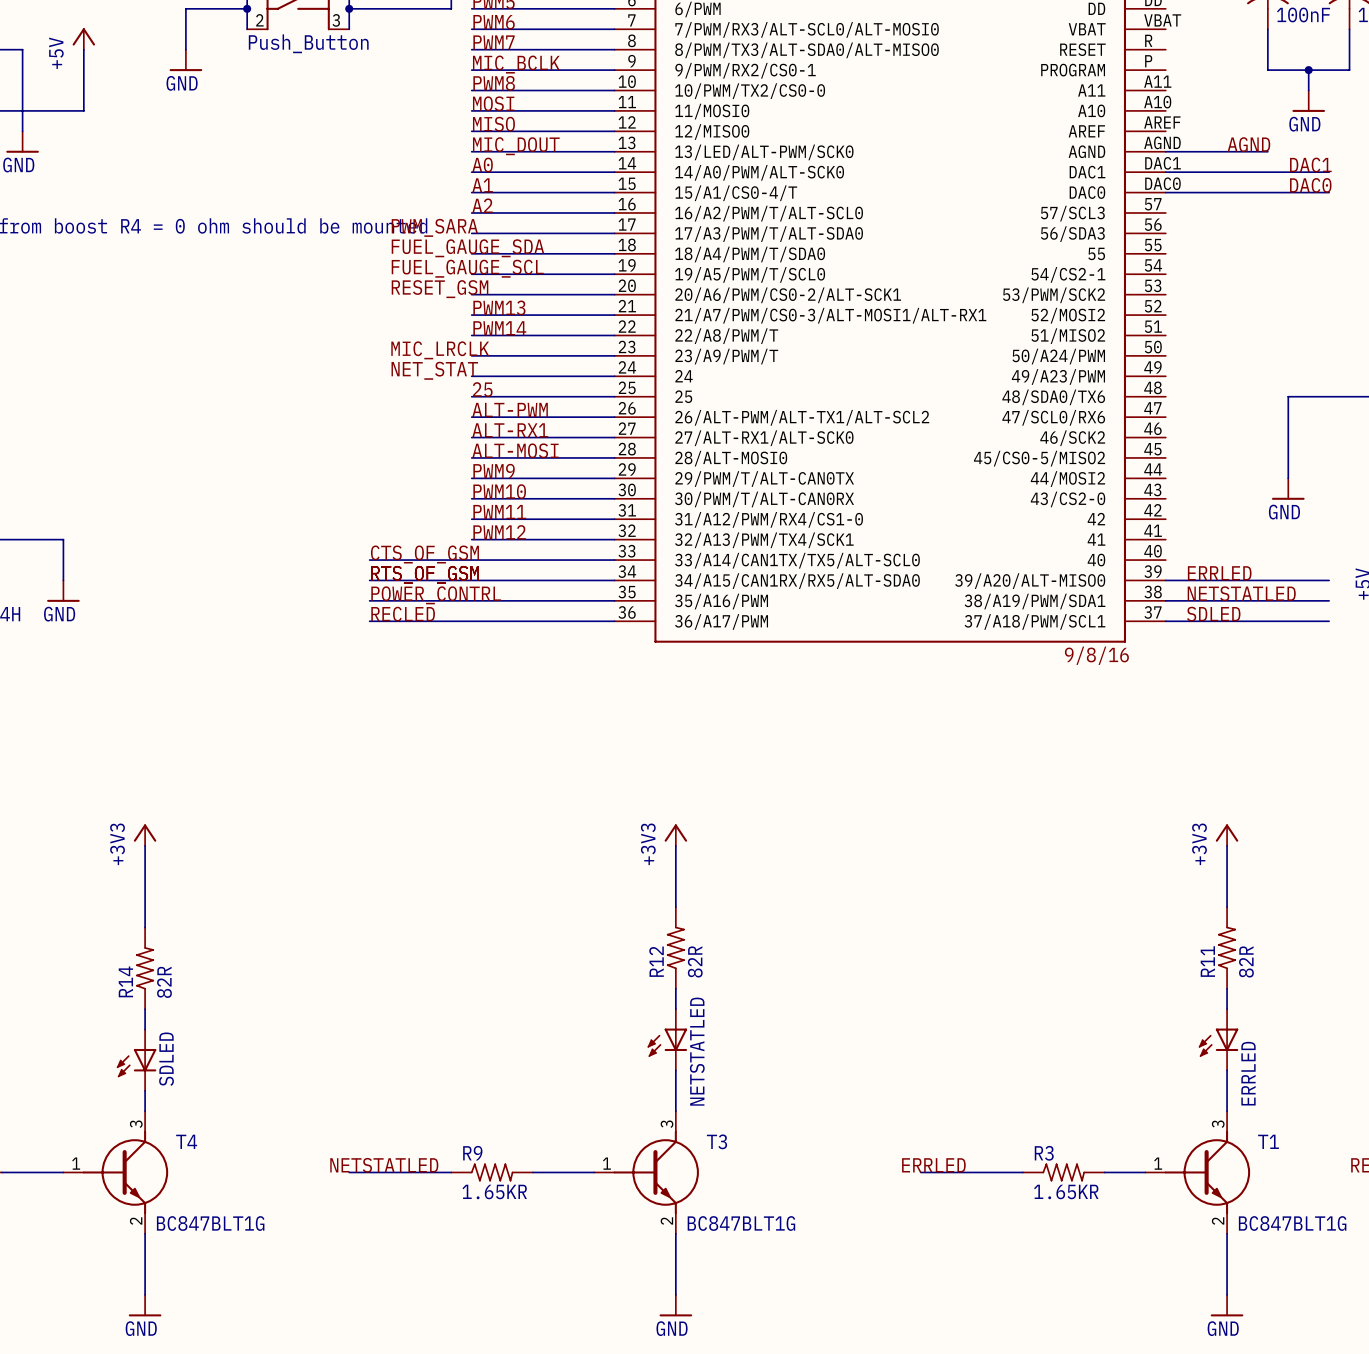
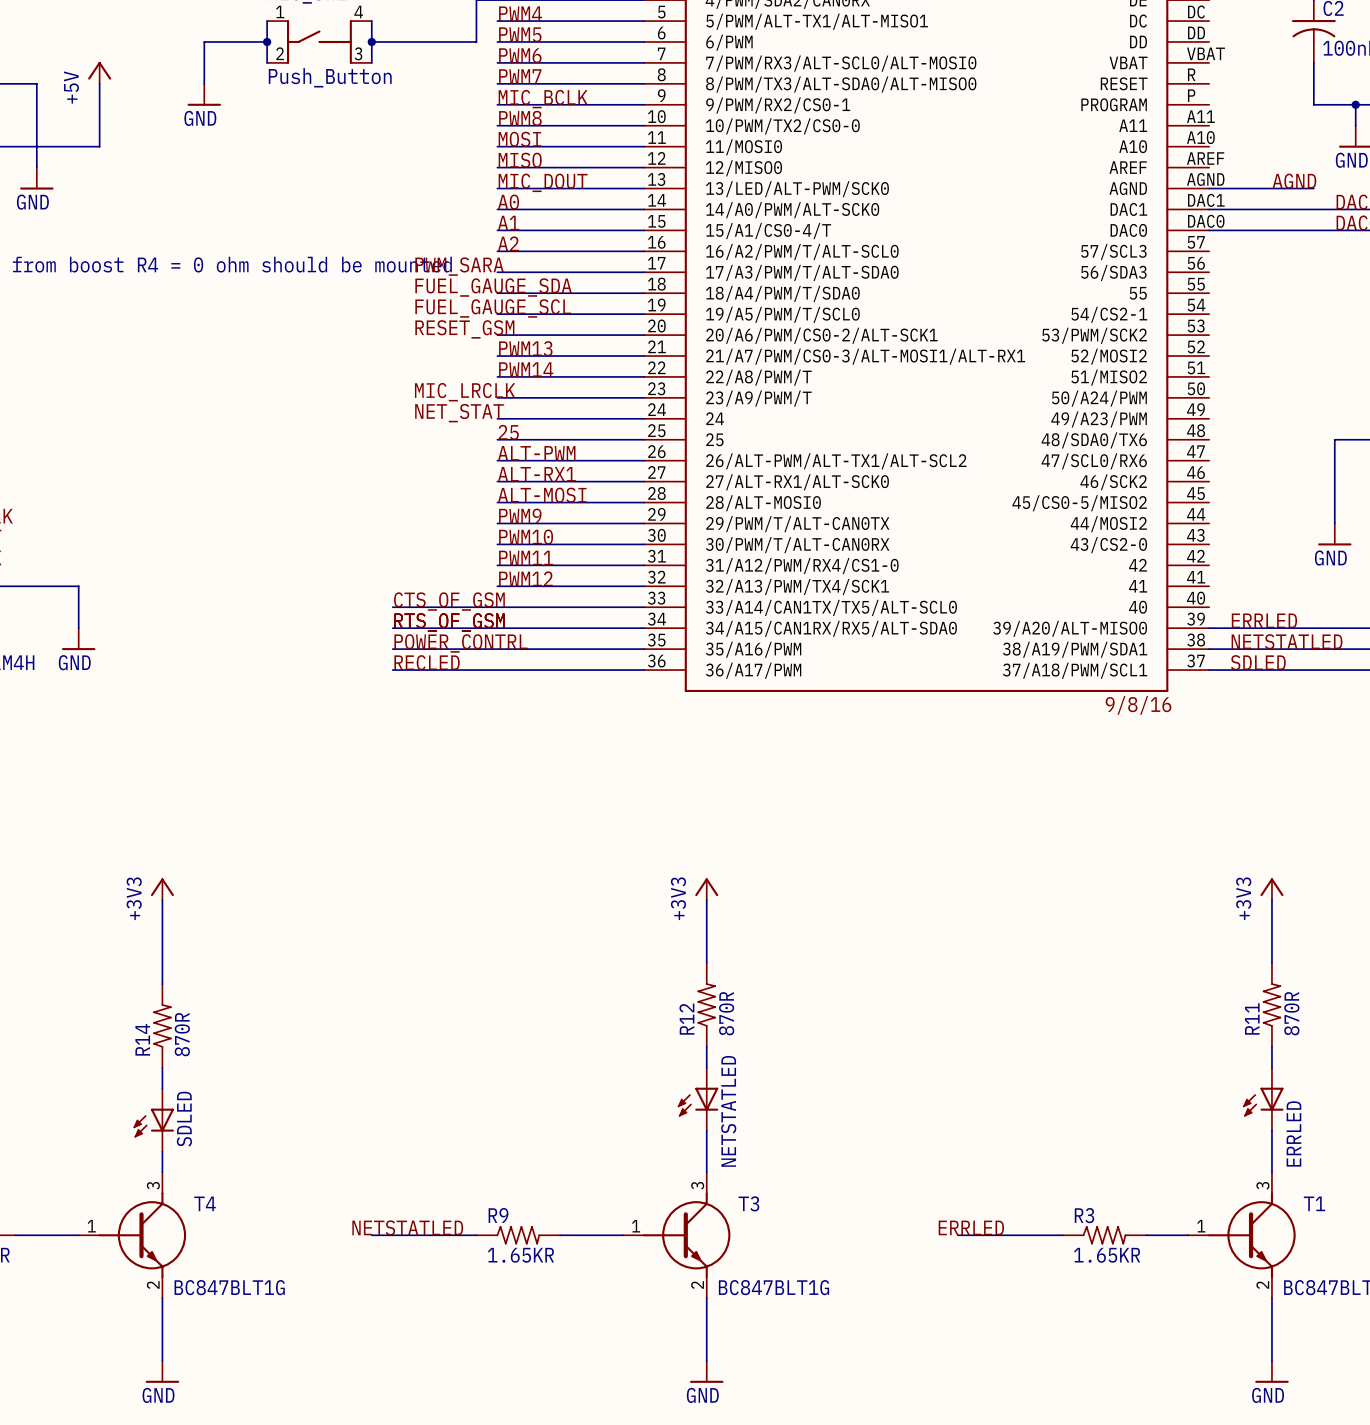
R12 value: 82R (695, 961) -> 870R (726, 1013)
R11 value: 82R (1246, 961) -> 870R (1291, 1013)
R14 value: 82R (164, 982) -> 870R (182, 1034)

